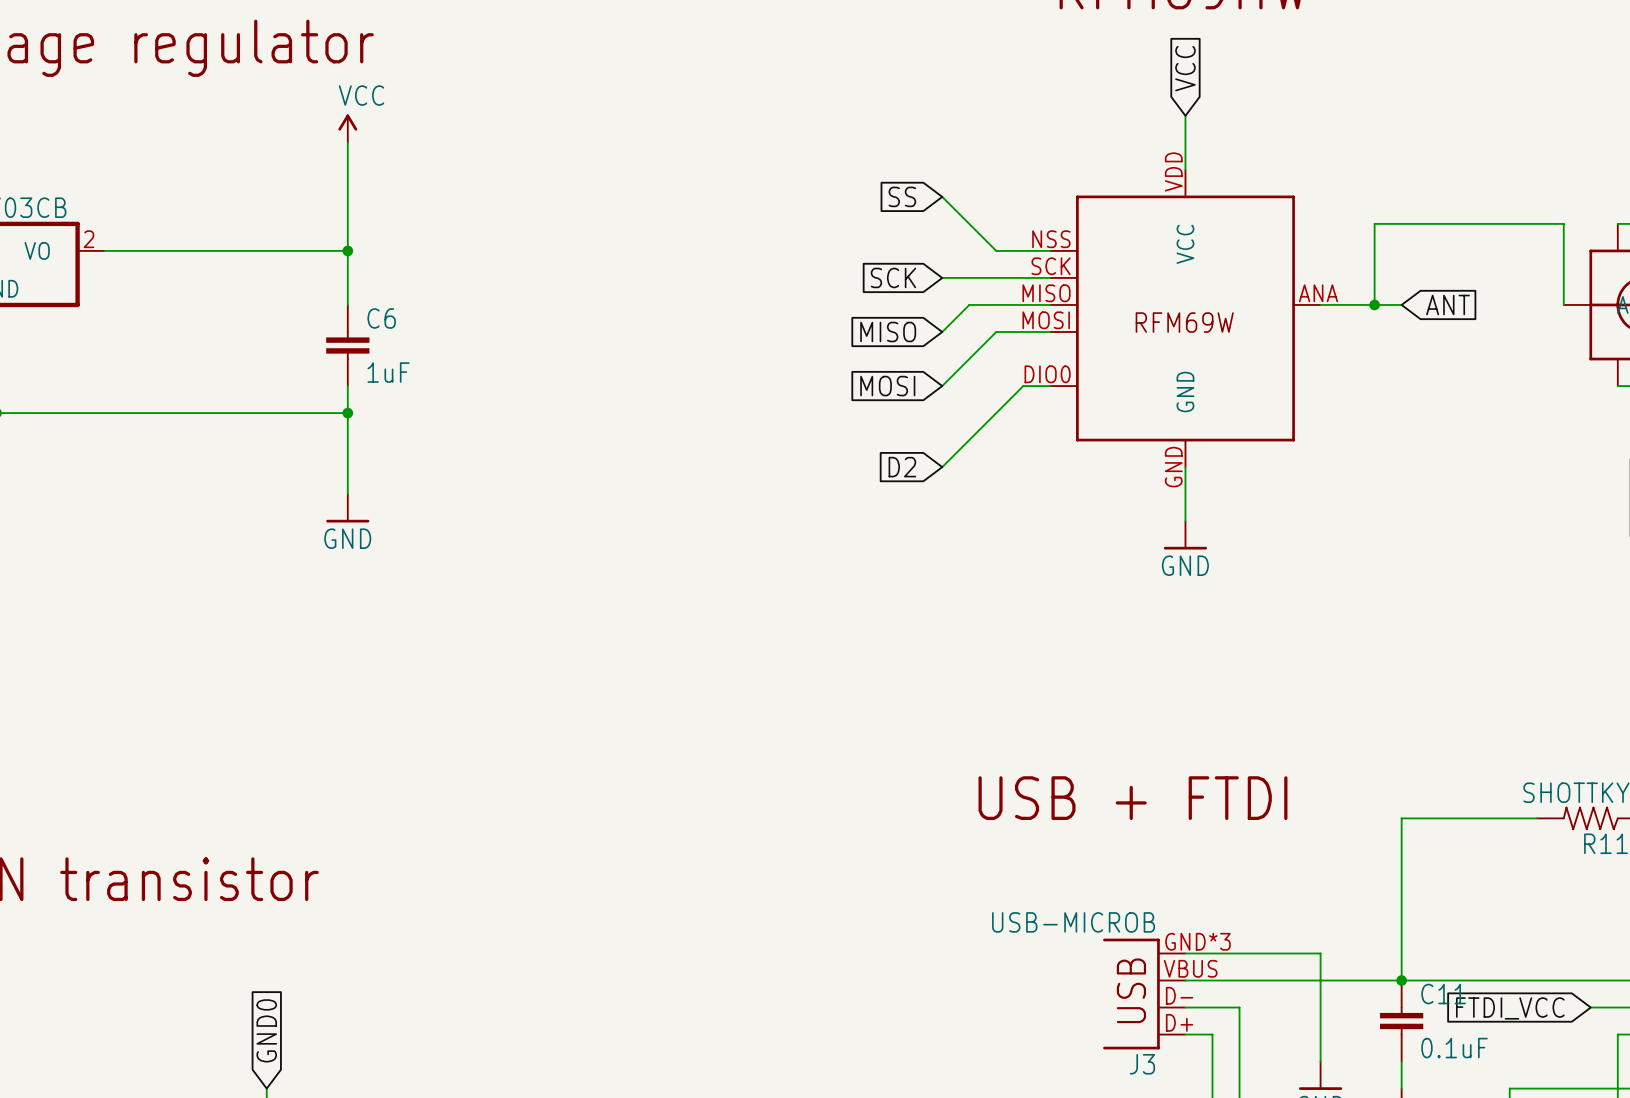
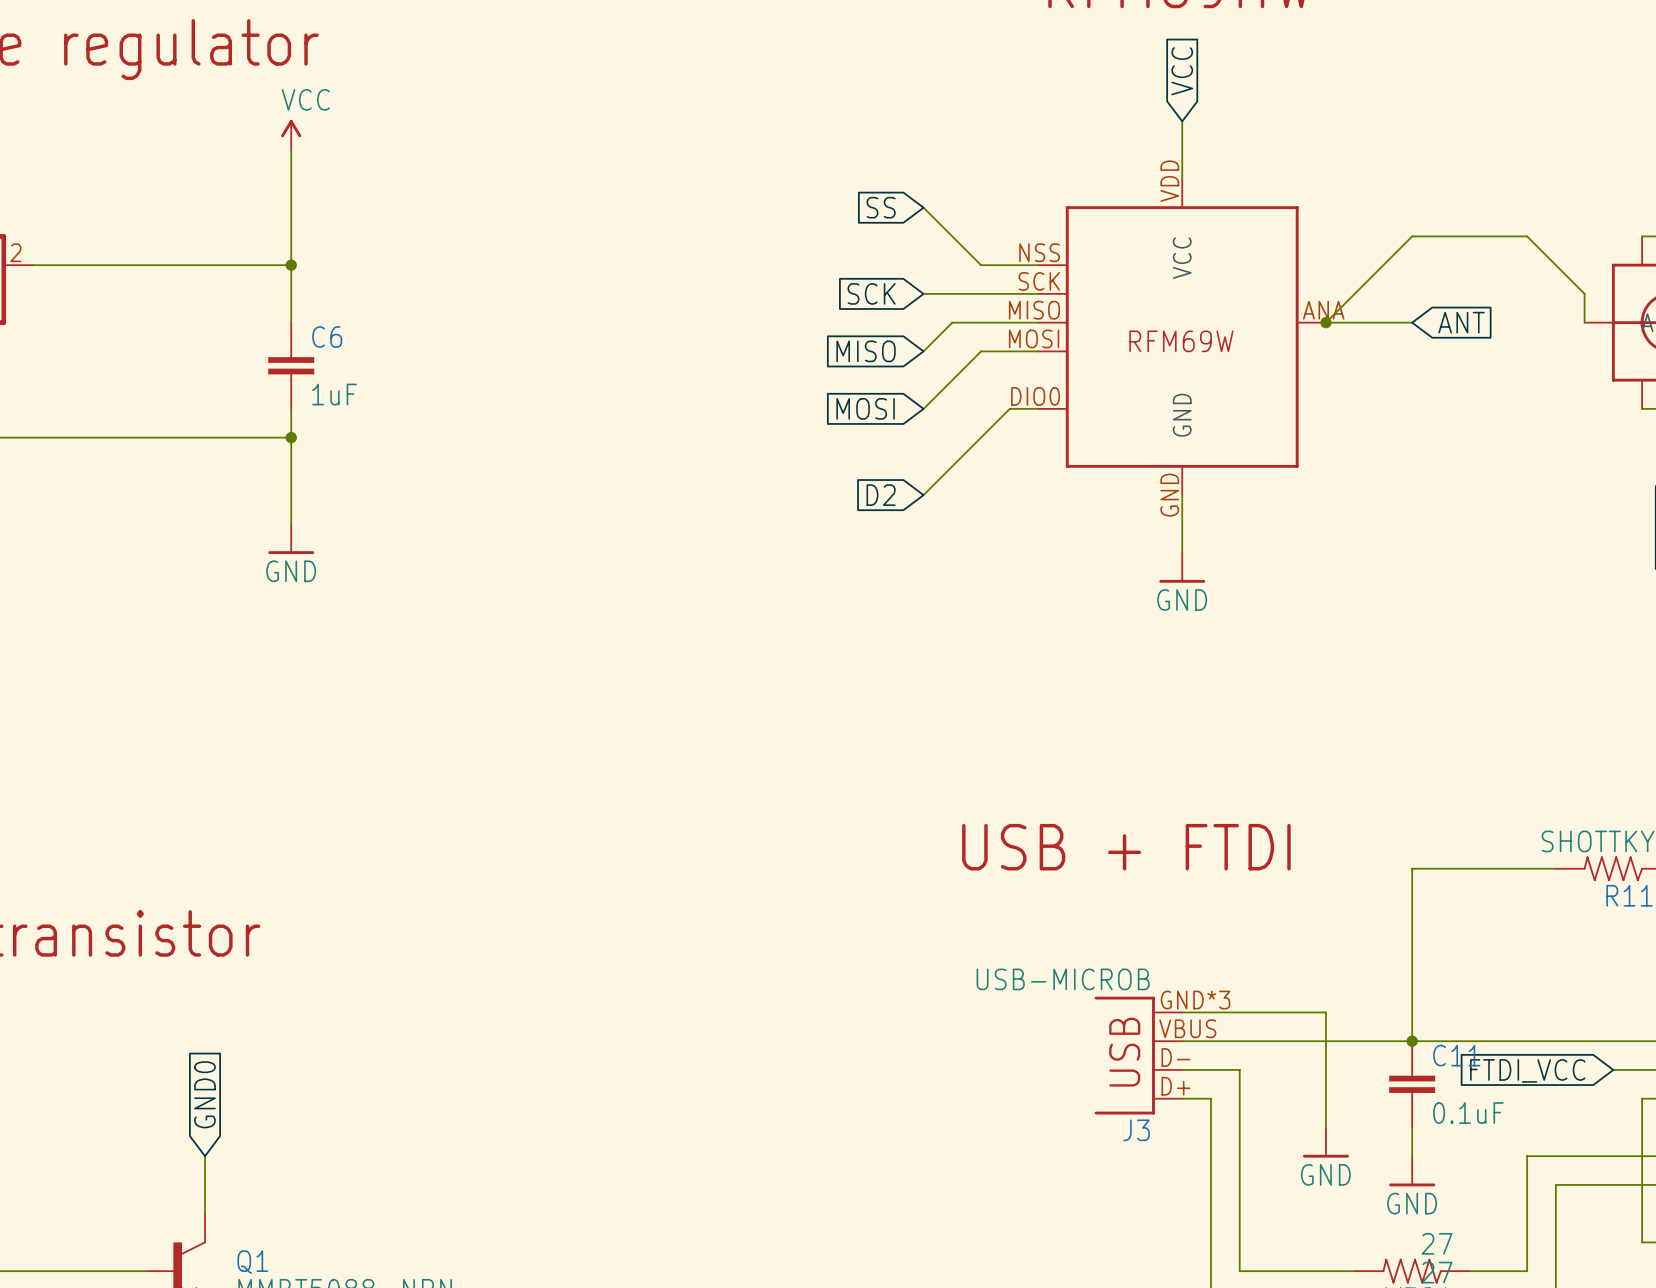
wire: (1401, 223) (1374, 223) (1374, 304) -> (1412, 236) (1325, 322)
wire: (1509, 223) (1563, 223) (1563, 277) -> (1527, 236) (1584, 293)
junction position: (1374, 304) -> (1325, 322)

